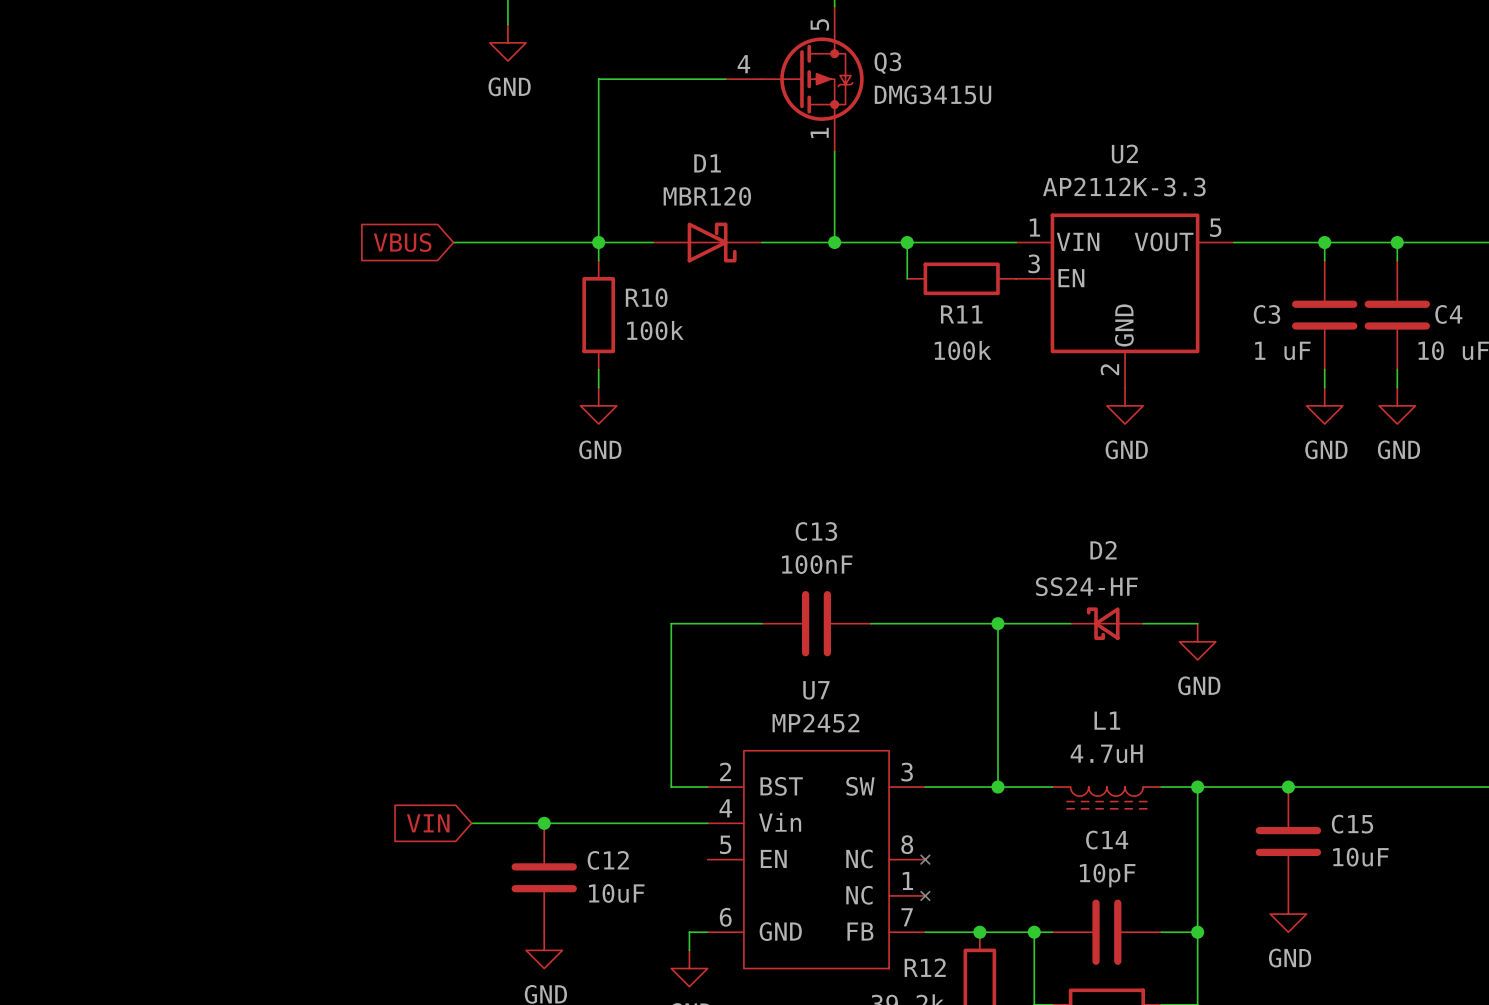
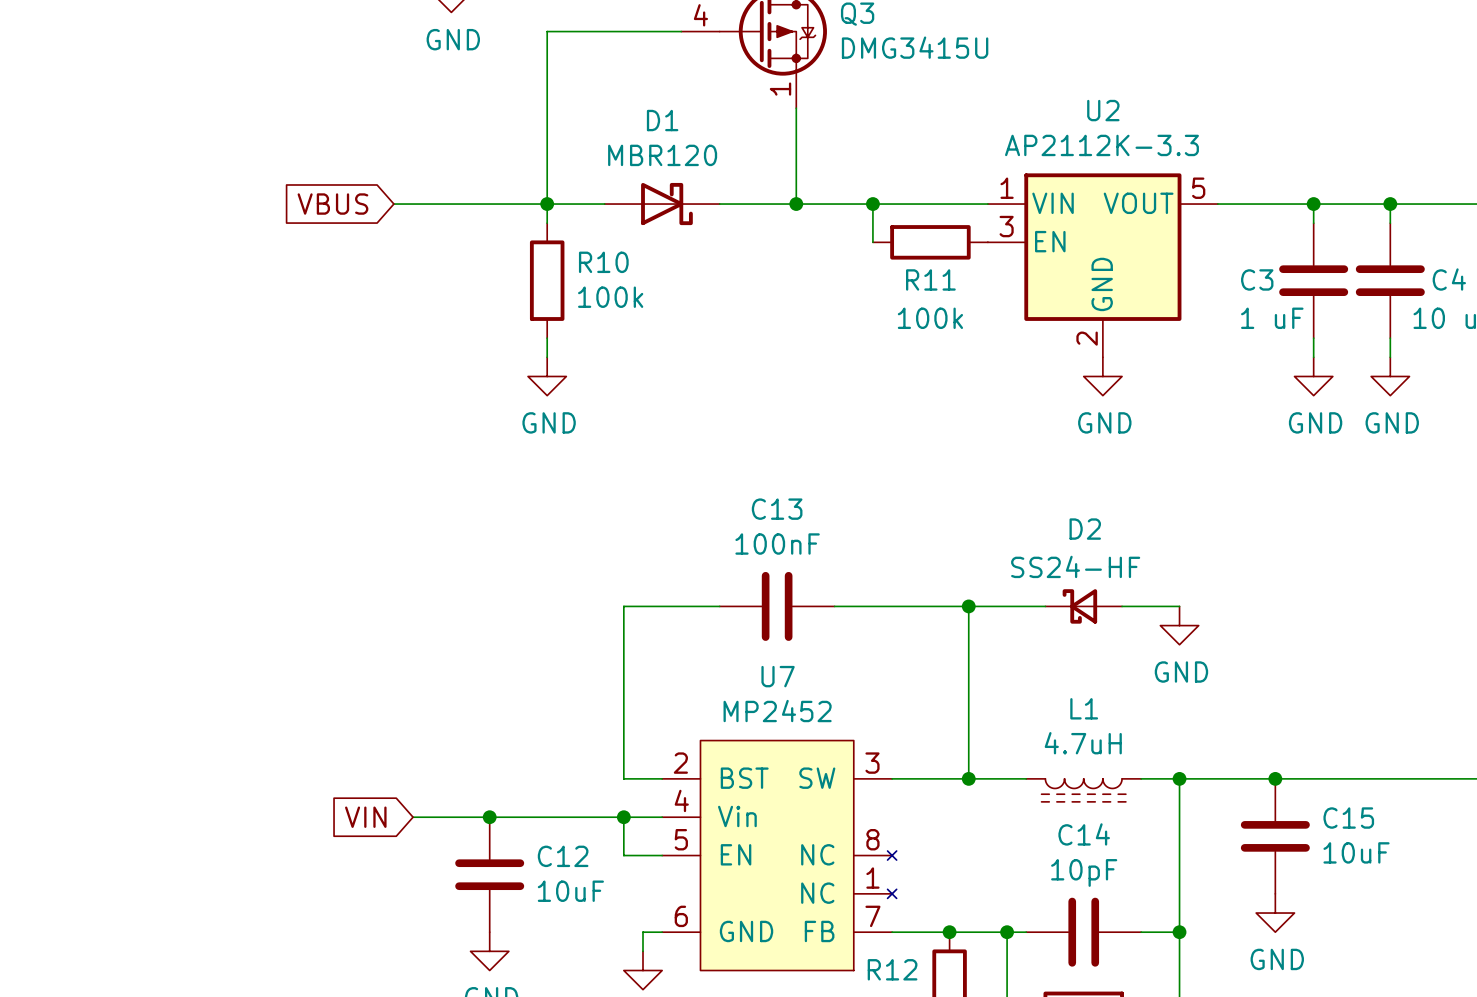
wire: none -> (623, 817) (623, 855) (662, 855)
junction: none -> (623, 817)

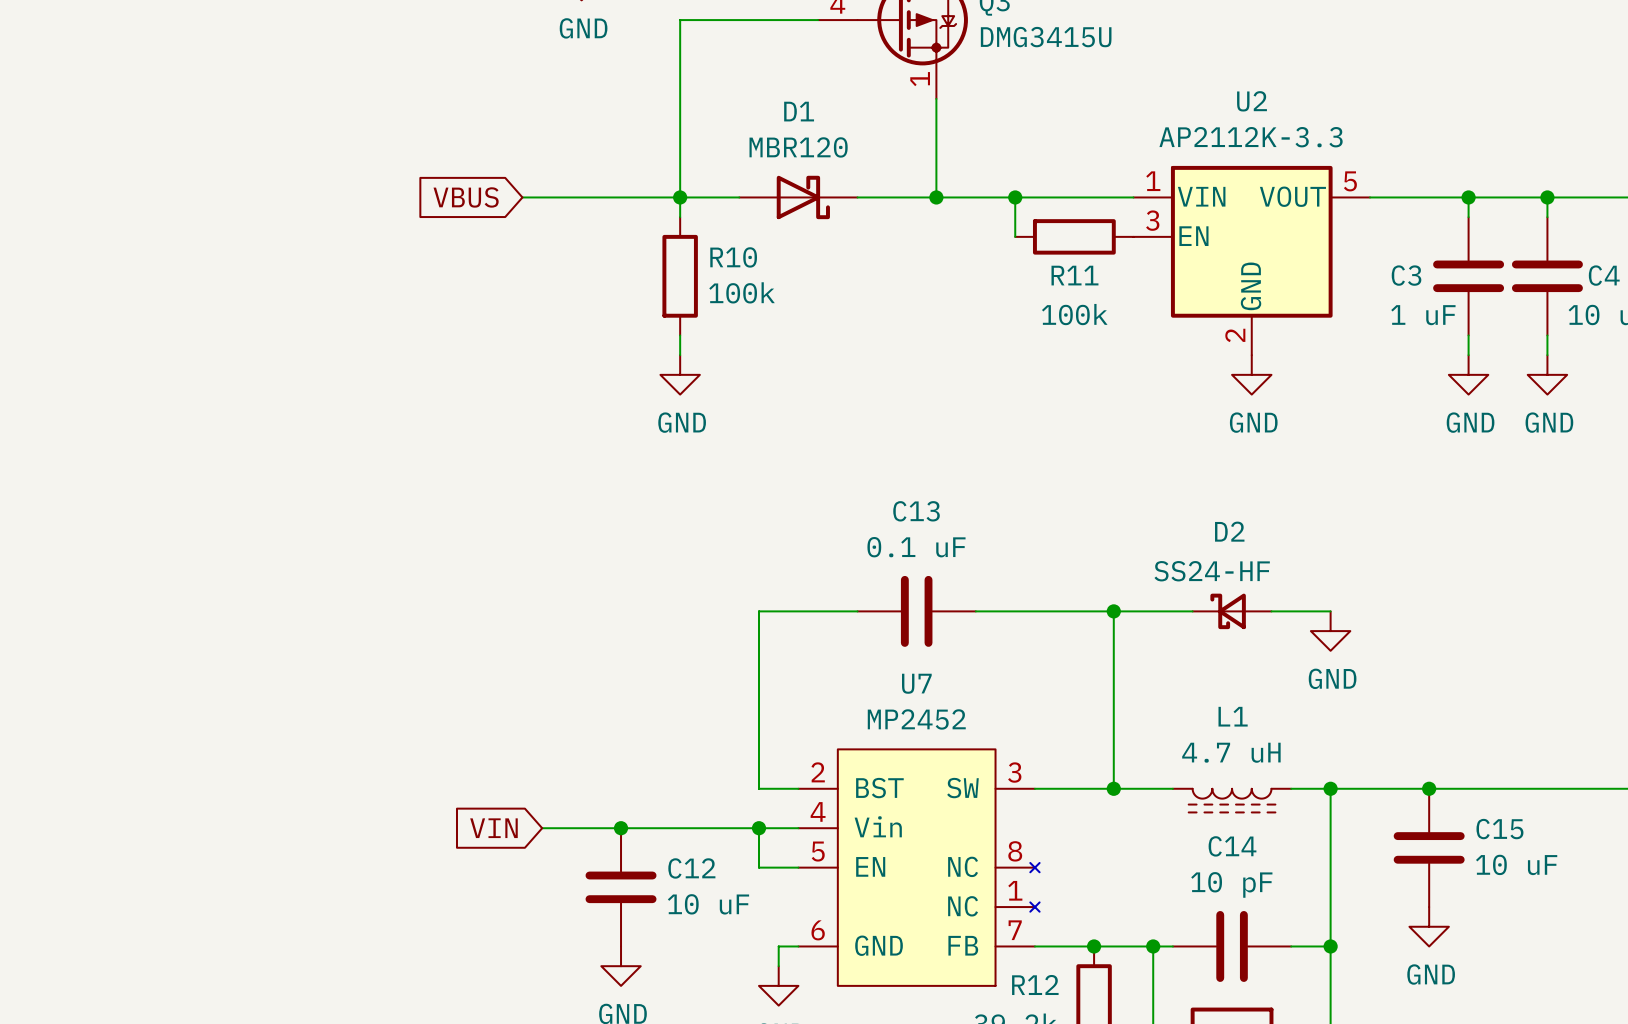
C13 value: 100nF (777, 544) -> 0.1 uF (916, 547)
L1 value: 4.7uH (1083, 743) -> 4.7 uH (1231, 752)
C15 value: 10uF (1356, 852) -> 10 uF (1516, 864)
C14 value: 10pF (1084, 872) -> 10 pF (1231, 884)
C12 value: 10uF (570, 891) -> 10 uF (708, 904)

